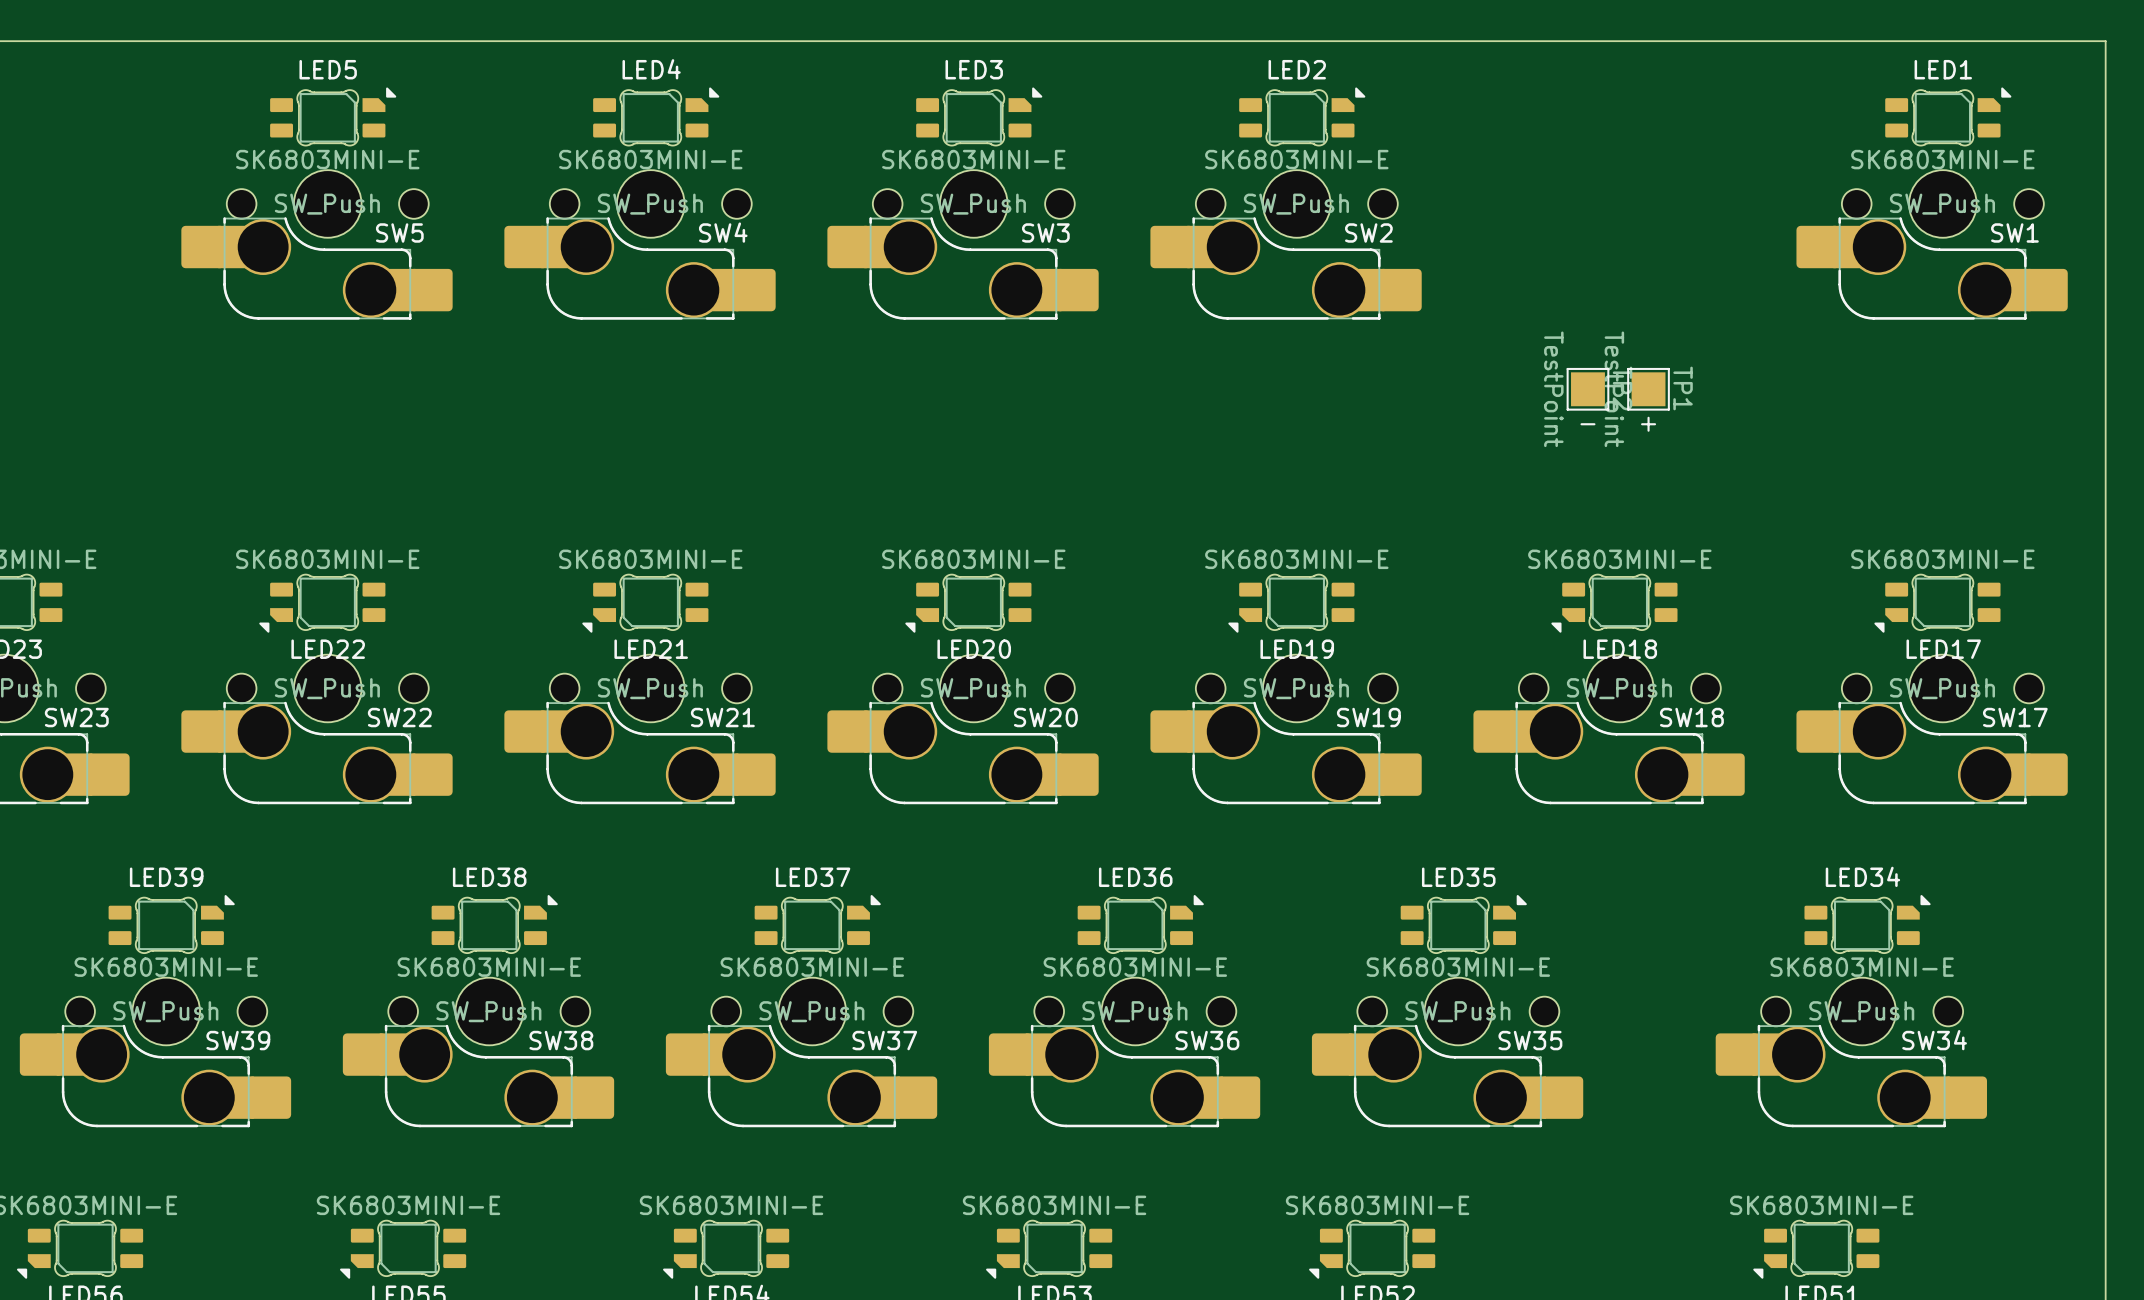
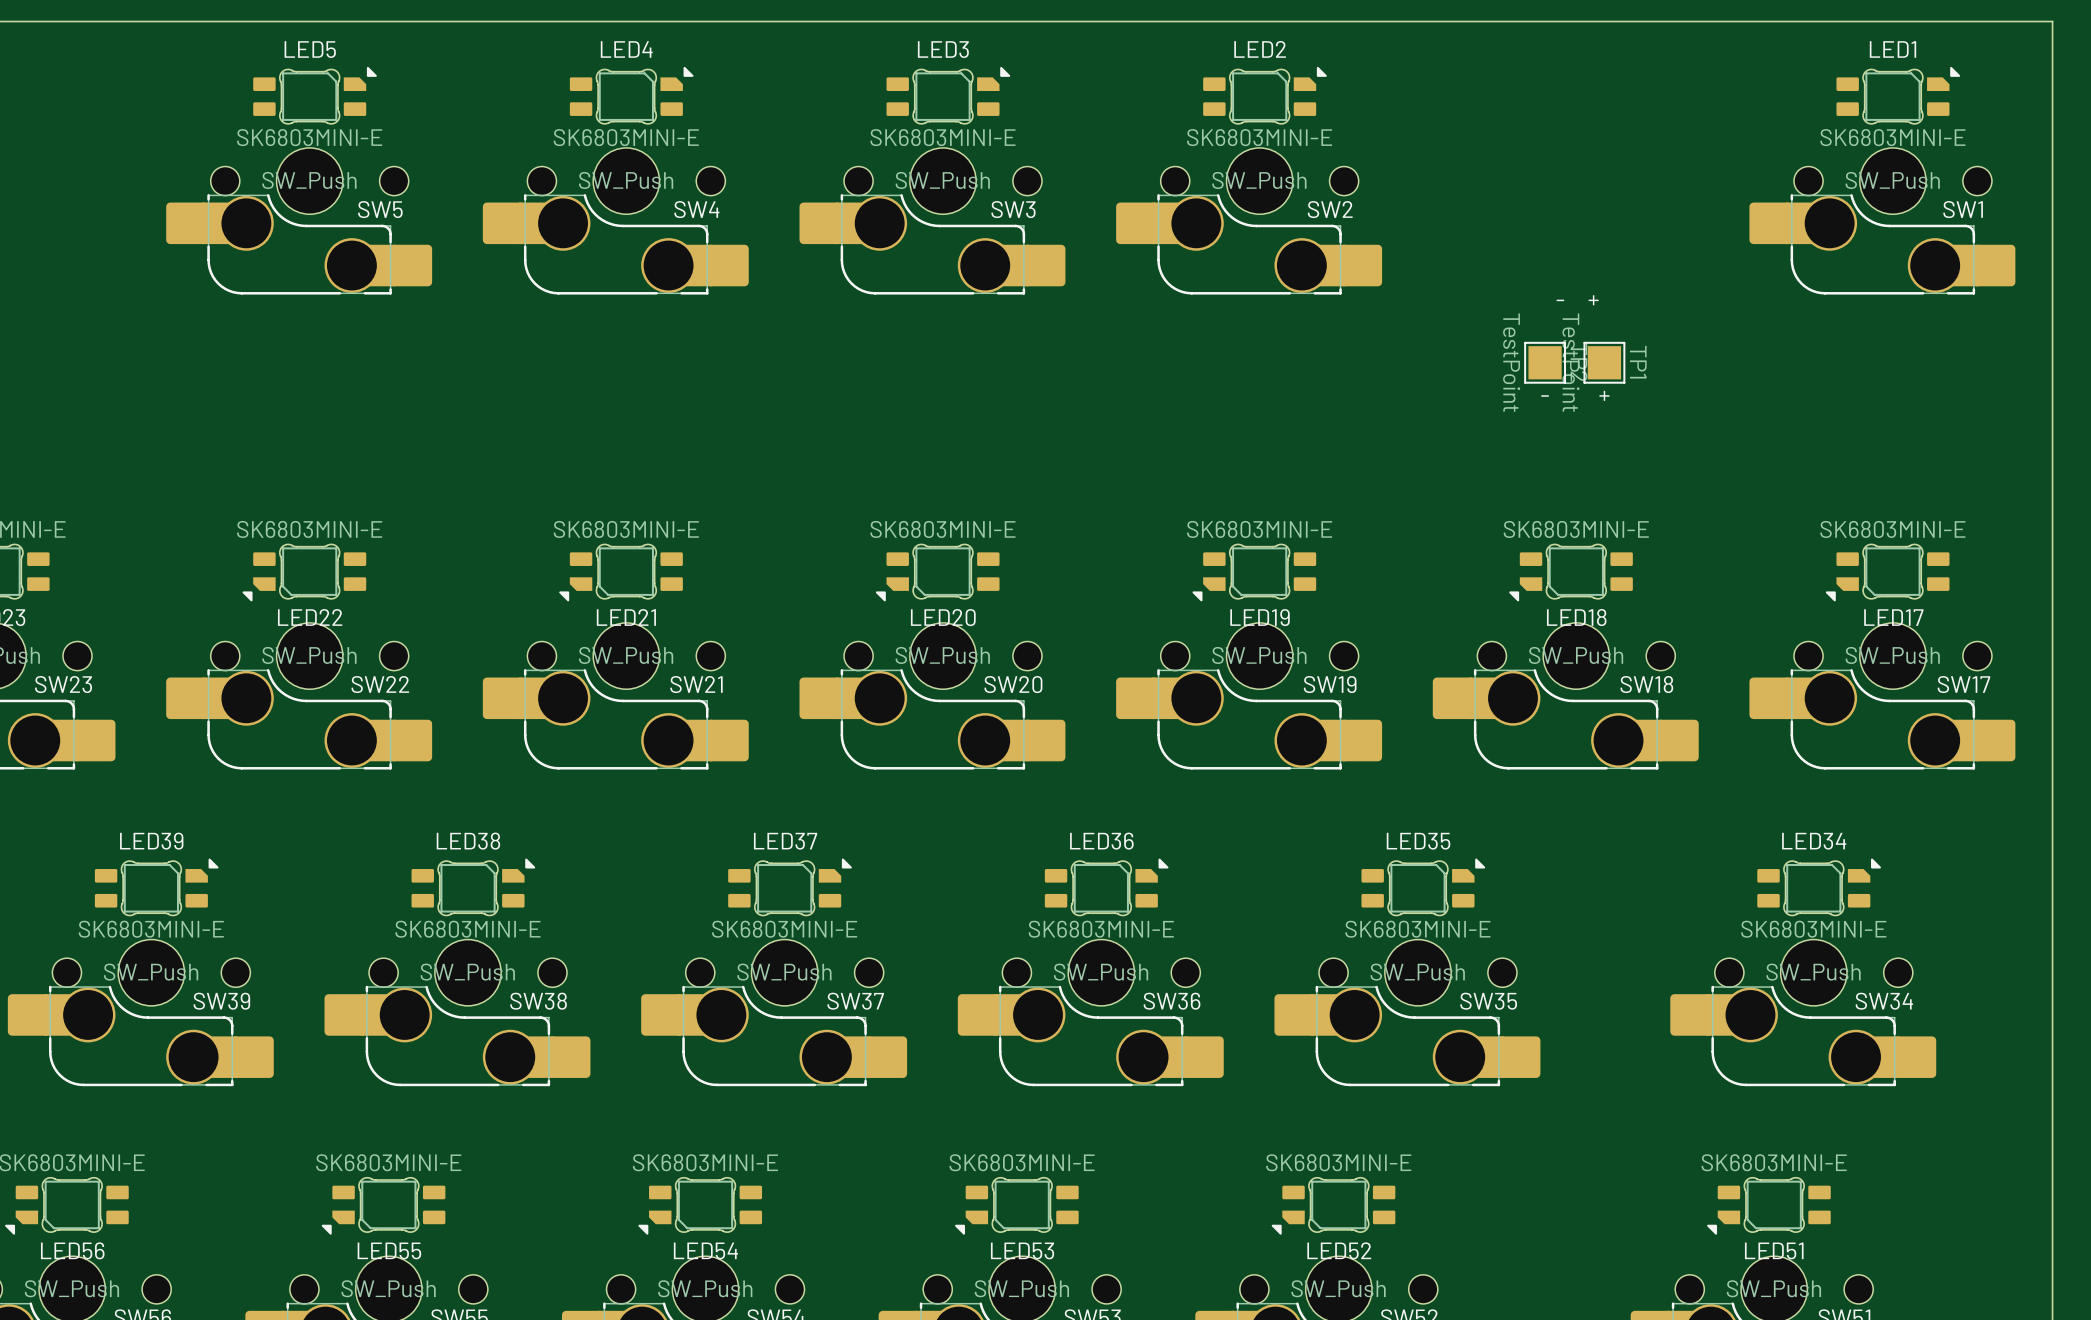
text: none -> - (1560, 300)
text: none -> + (1593, 300)

